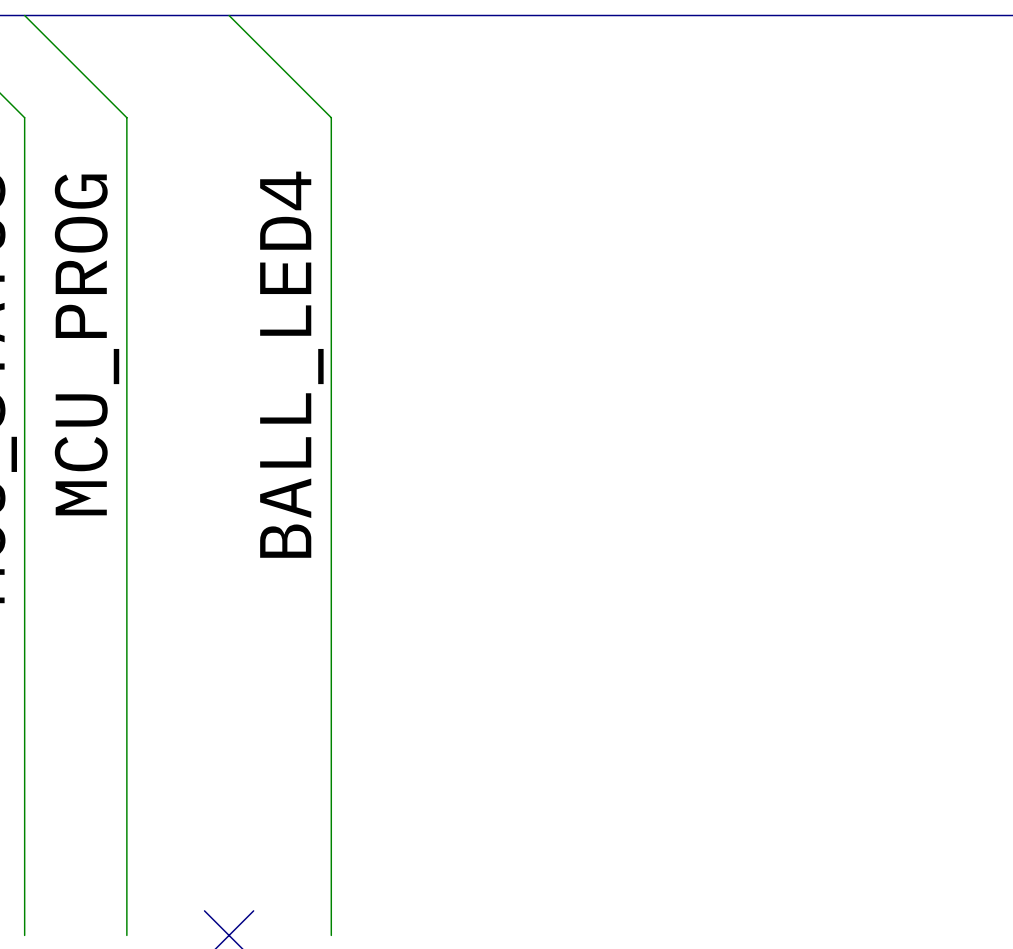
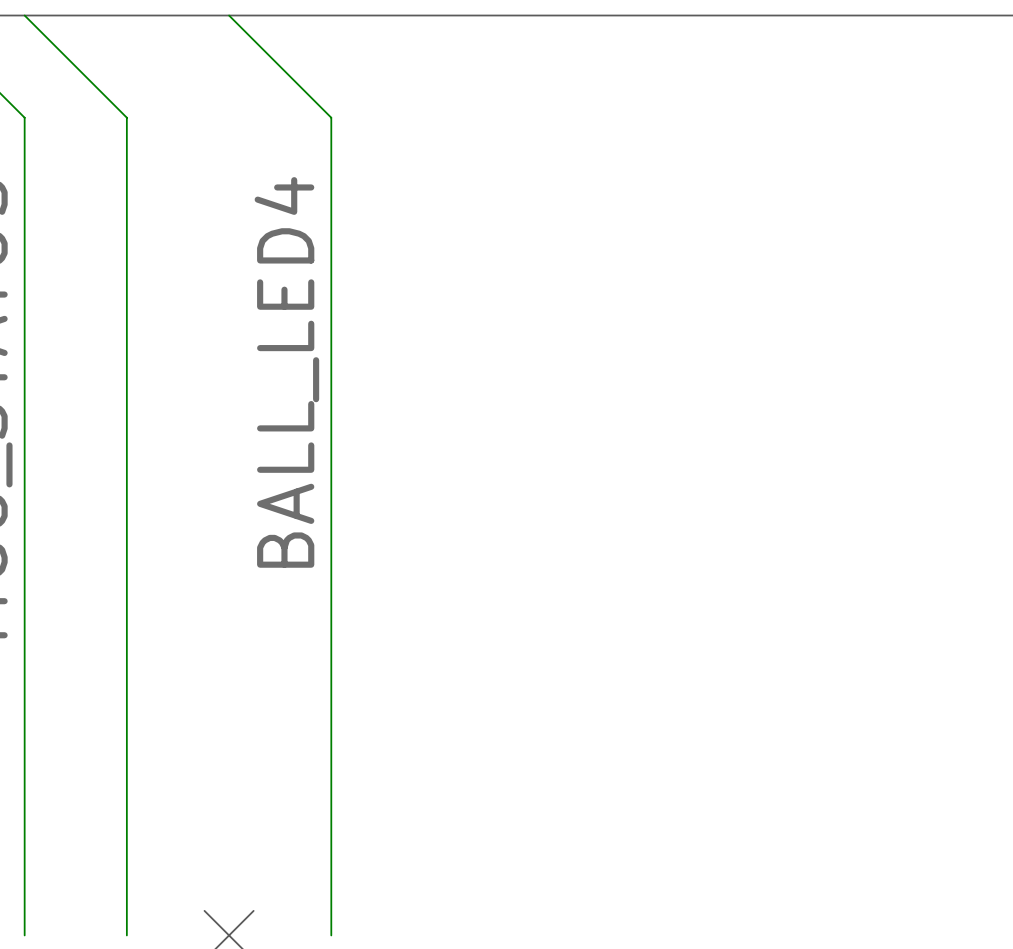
label: MCU_PROG (87, 344) -> none

